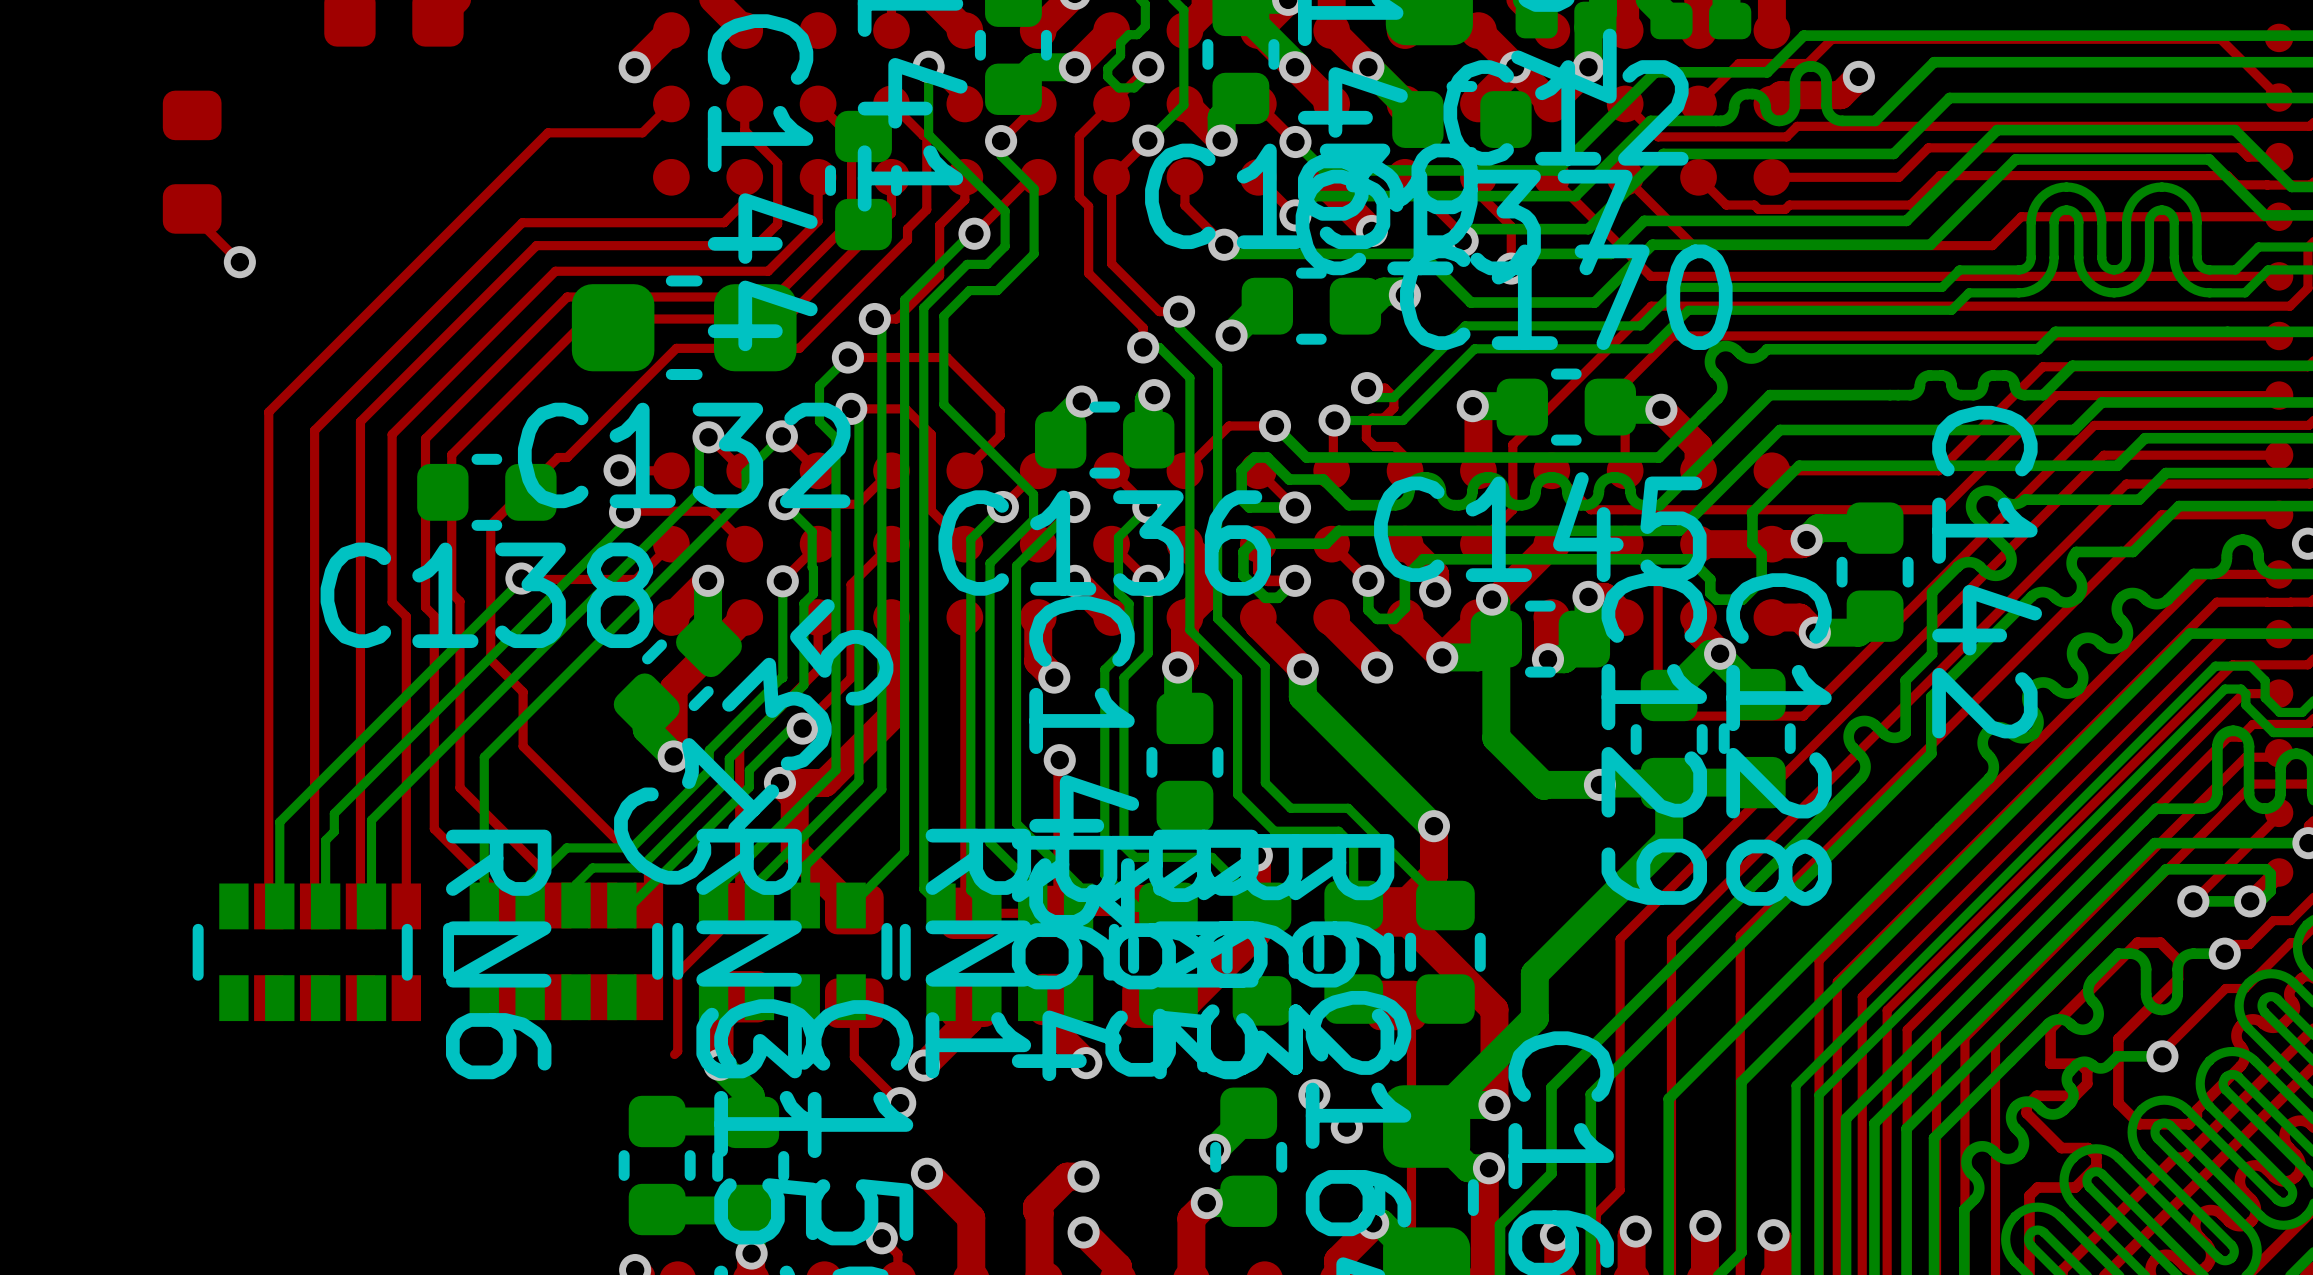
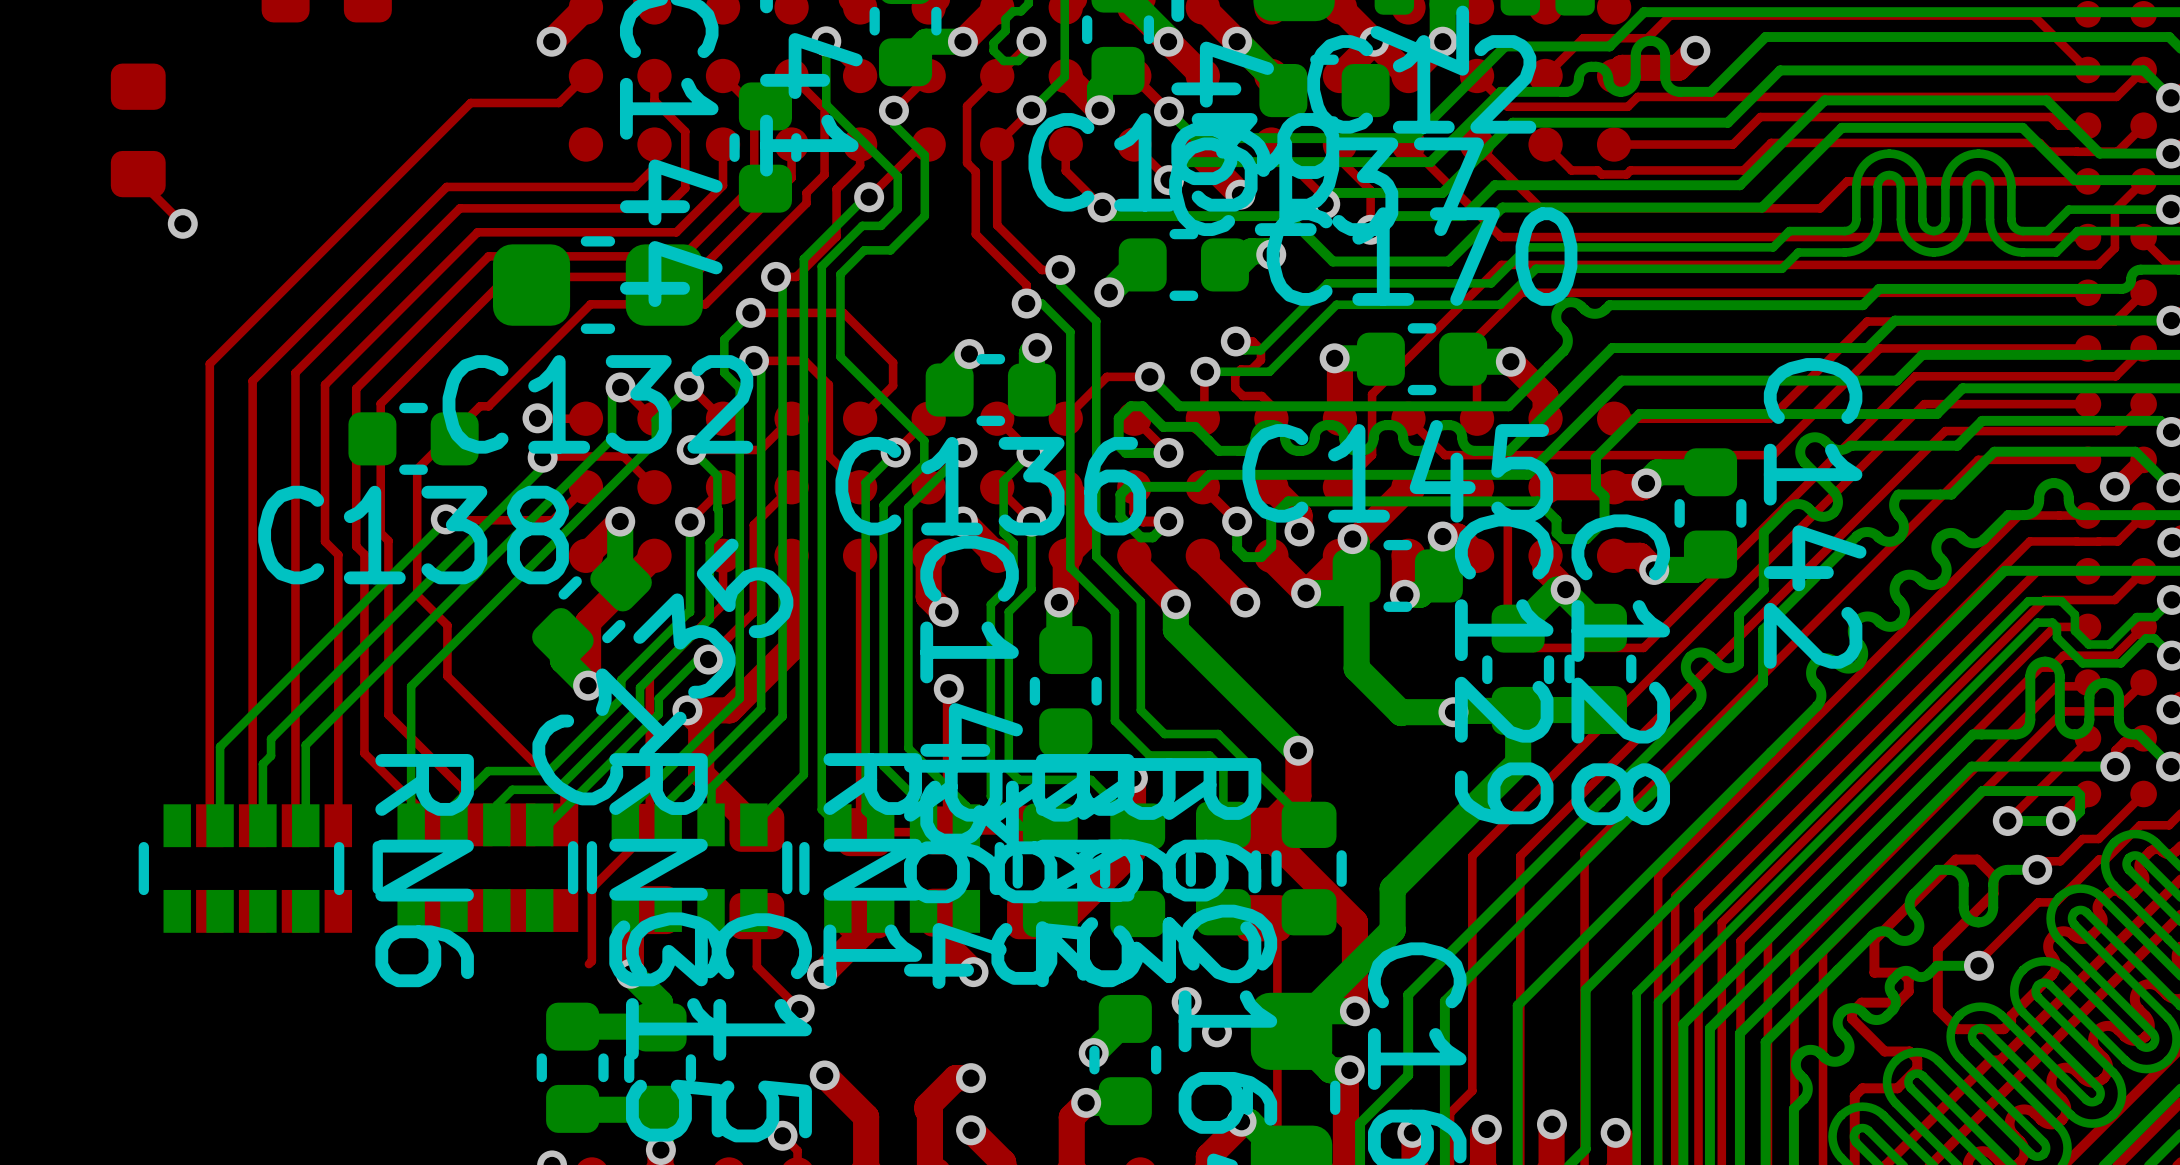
bottom track: (1961, 395) (1953, 391) (1948, 378) (1941, 375) (1924, 377) (1920, 381) (1917, 391) (1910, 395) -> (1791, 348) (1743, 348)
bottom track: (2024, 395) (2017, 392) (2012, 379) (2004, 375) (1987, 377) (1984, 381) (1981, 391) (1973, 395) -> (1850, 348) (1802, 348)
bottom track: (1644, 505) (1633, 499) (1626, 481) (1616, 477) (1609, 478) (1602, 481) (1596, 499) (1586, 505) (1572, 502) (1568, 496) (1564, 483) (1553, 477) (1545, 478) (1539, 481) (1534, 496) (1530, 502) (1523, 505) (1514, 504) (1505, 498) (1500, 481) (1493, 478) (1486, 477) (1475, 483) (1471, 496) (1467, 502) (1452, 505) (1443, 499) (1436, 481) (1430, 478) (1422, 477) (1412, 483) (1408, 496) (1402, 503) (1374, 505) -> (1494, 450) (1468, 449) (1463, 442) (1459, 430) (1449, 425) (1437, 427) (1433, 433) (1430, 445) (1419, 450) (1412, 450) (1407, 447) (1400, 430) (1392, 425) (1378, 427) (1374, 433) (1371, 445) (1360, 450) (1353, 450) (1347, 447) (1342, 431) (1334, 425) (1325, 425) (1319, 427) (1310, 447) (1305, 450) (1297, 450) (1287, 445) (1284, 433) (1280, 427) (1266, 425) (1258, 430) (1251, 447) (1242, 450)

